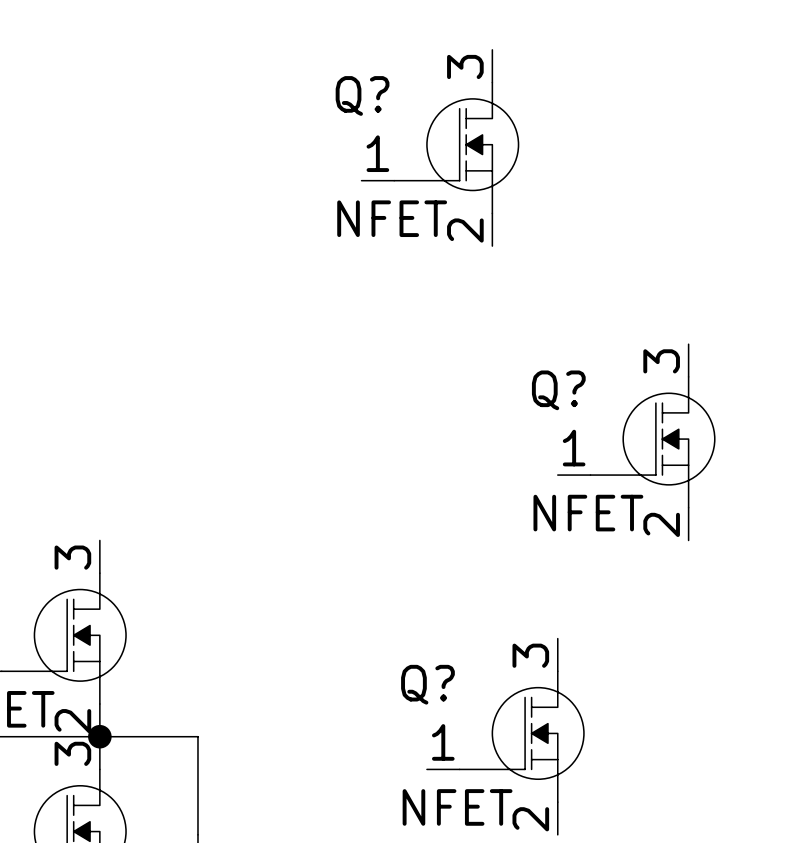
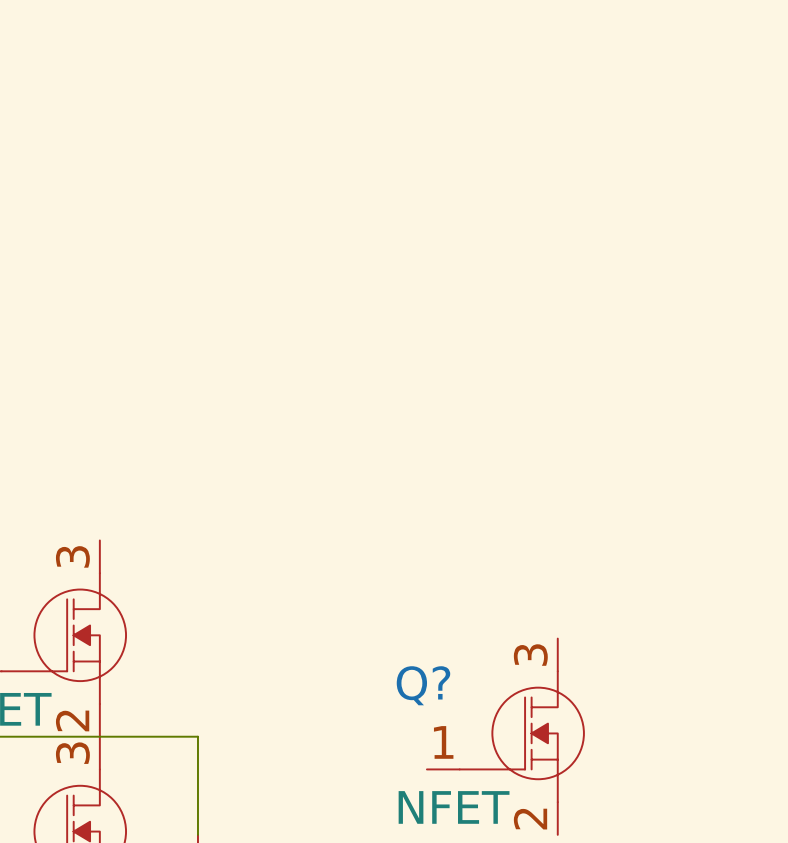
Q?: NFET (440, 147) -> none
Q?: NFET (636, 442) -> none
junction: (99, 736) -> none

